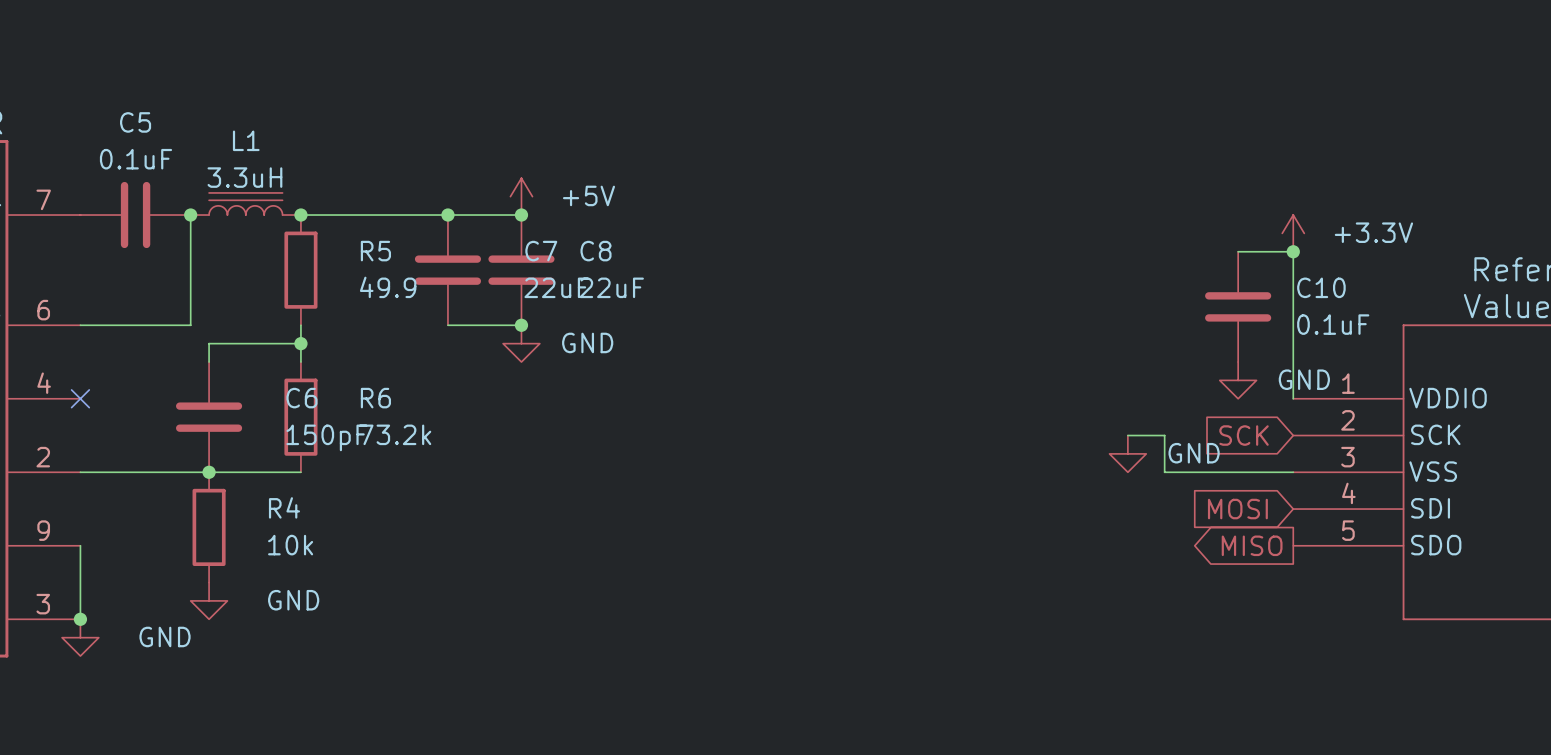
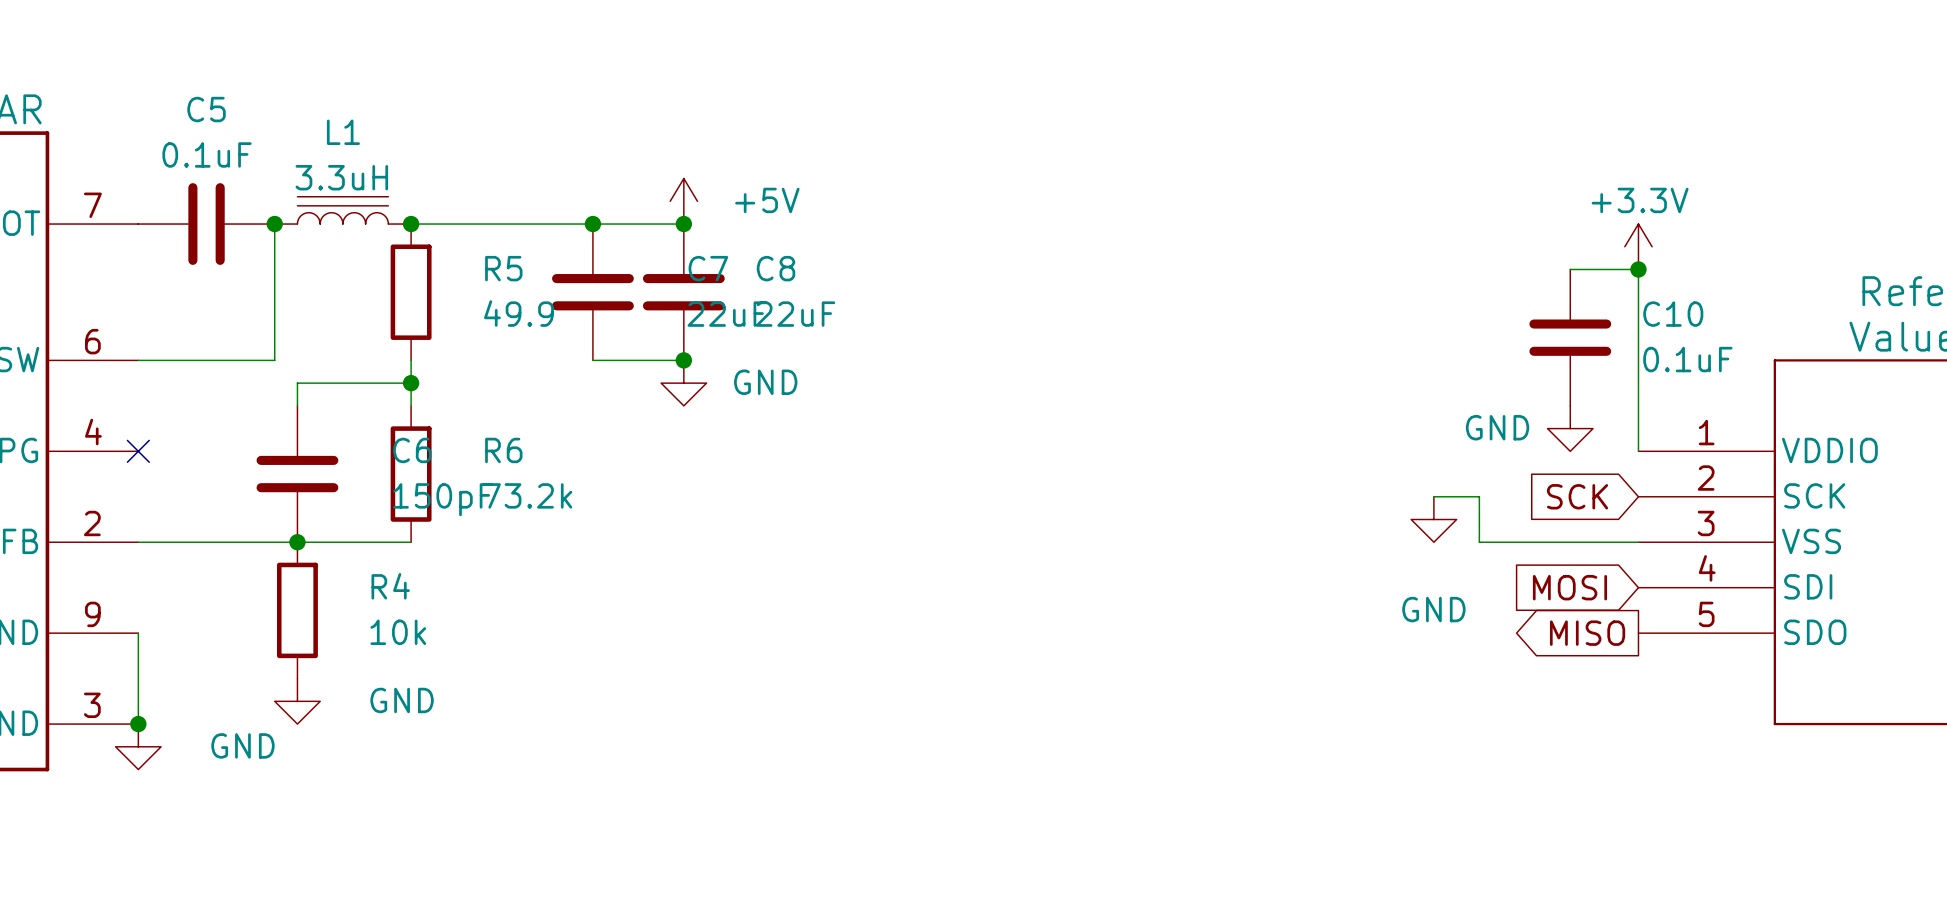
power symbol text position: +3.3V (1373, 232) -> +3.3V (1640, 200)
power symbol text position: GND (1304, 379) -> GND (1497, 427)
power symbol text position: GND (1194, 453) -> GND (1433, 609)

